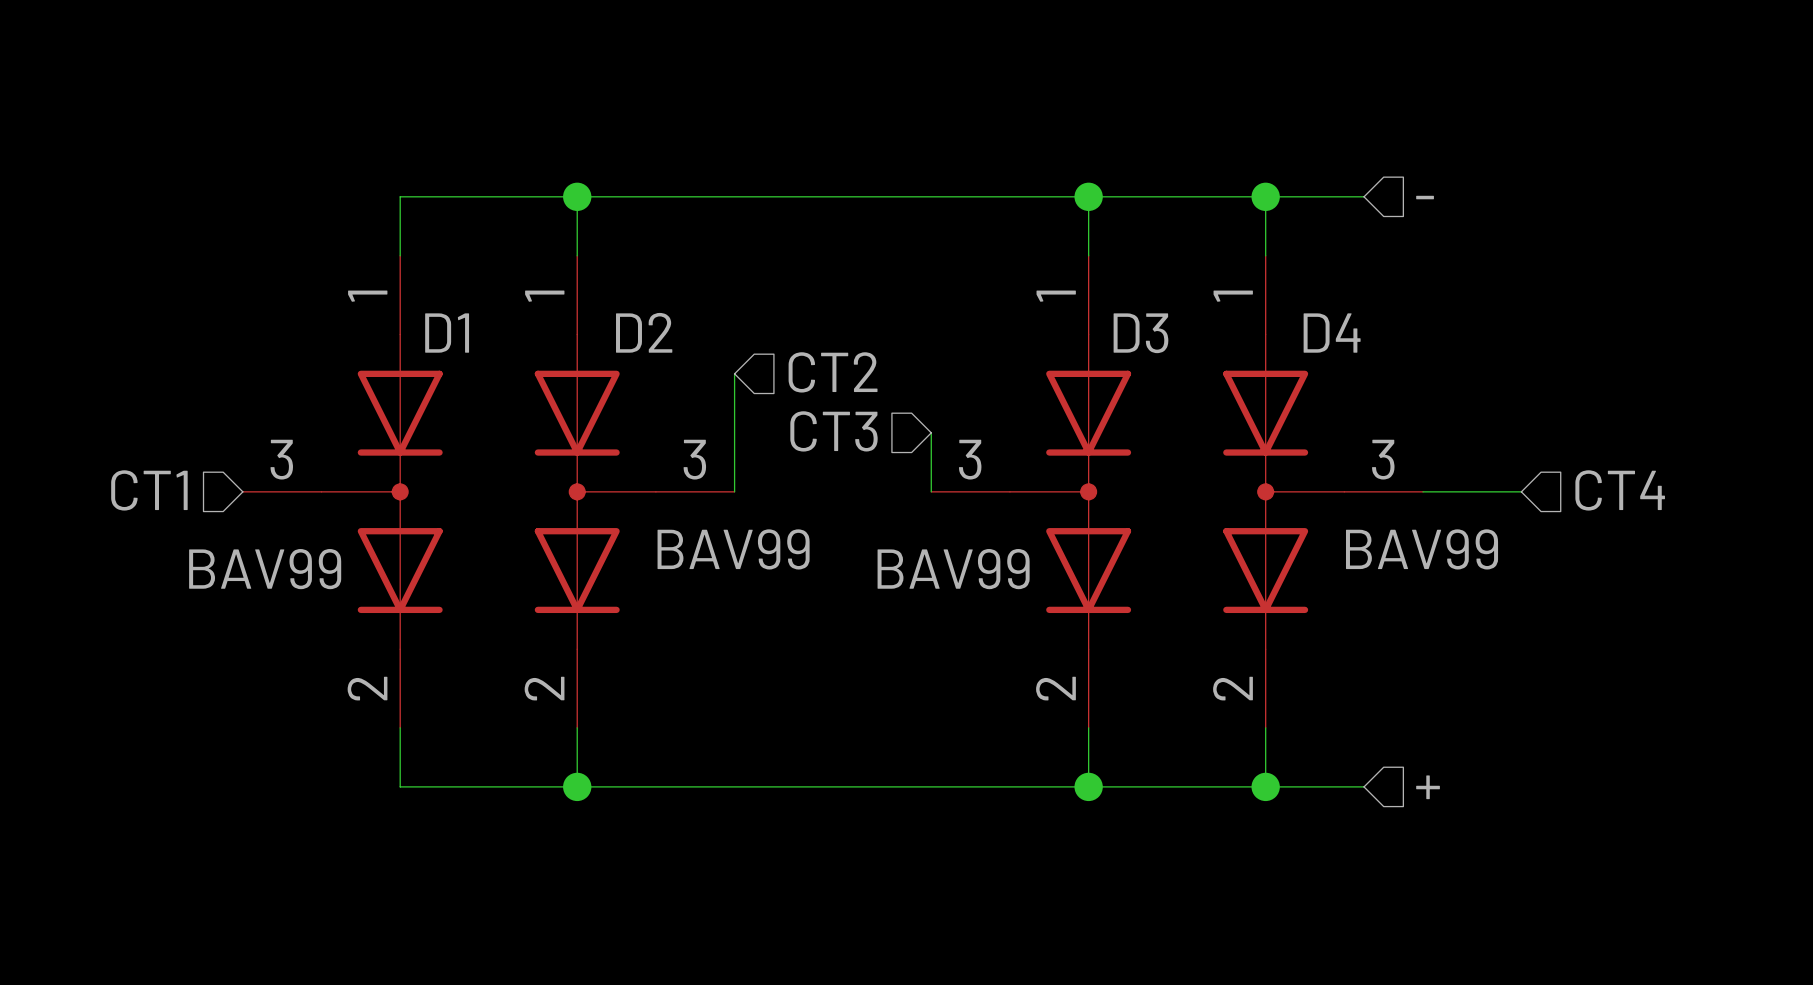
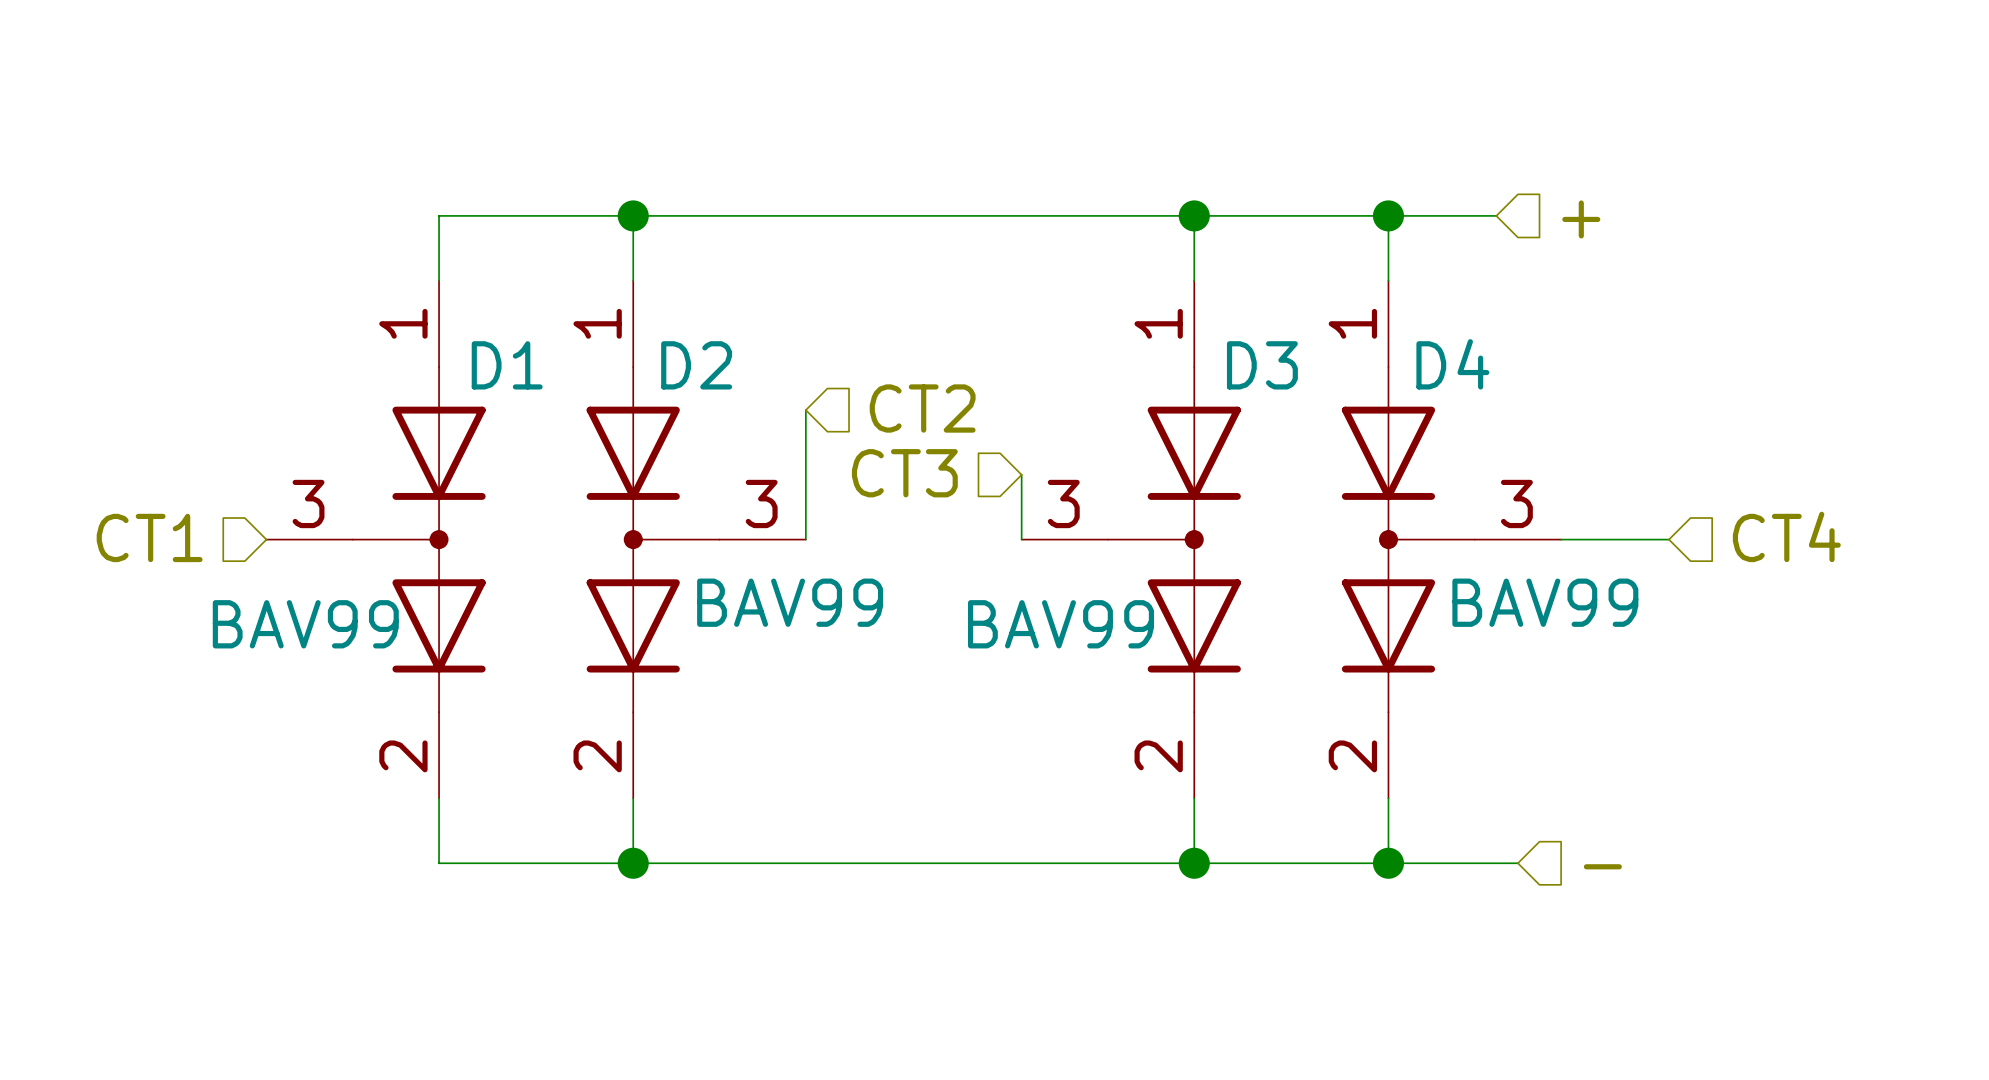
hierarchical label: - (1425, 197) -> + (1581, 219)
wire: none -> (1496, 863) (1517, 863)
hierarchical label: + (1428, 787) -> - (1602, 866)

